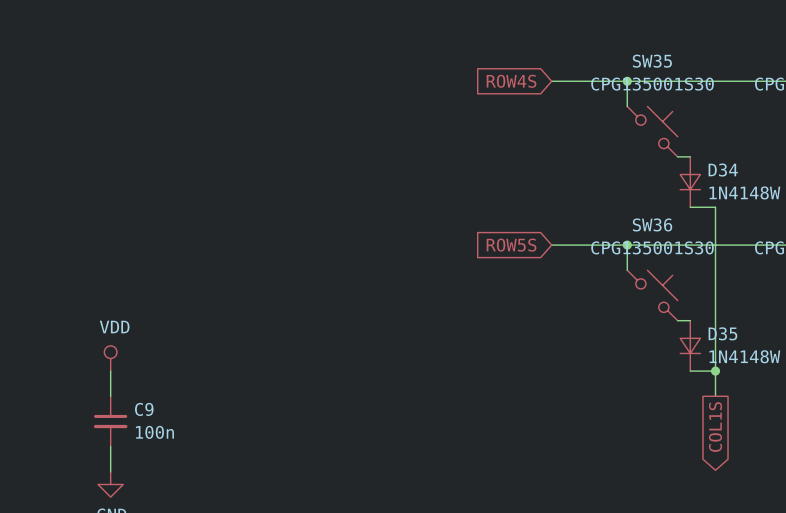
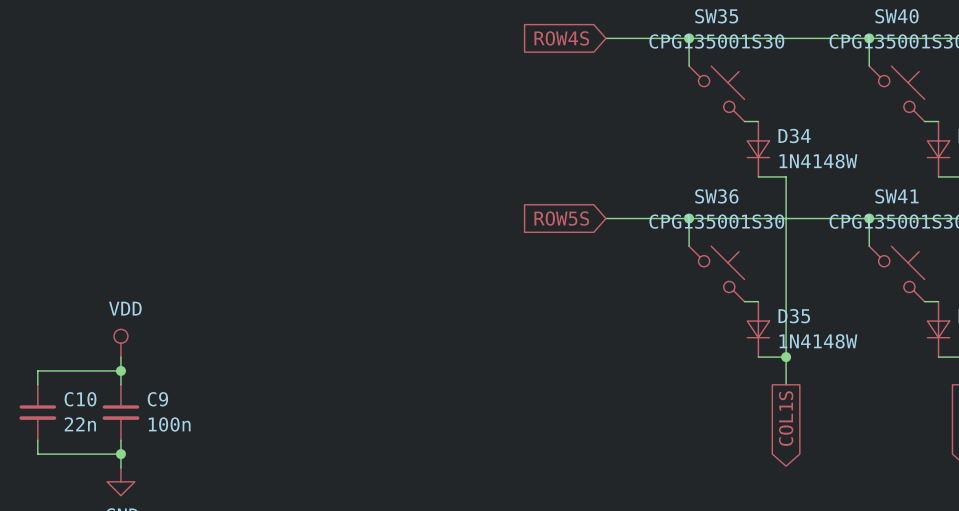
wire: none -> (120, 370) (37, 370) (37, 384)
junction: none -> (120, 370)
C10: none -> 22n (37, 412)
wire: none -> (37, 440) (37, 454) (120, 454)
junction: none -> (120, 454)

